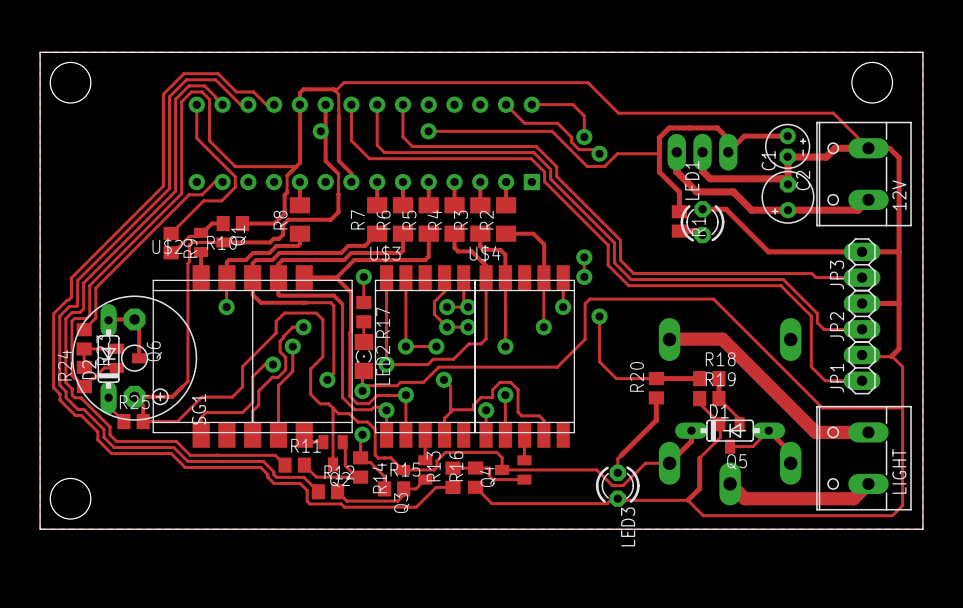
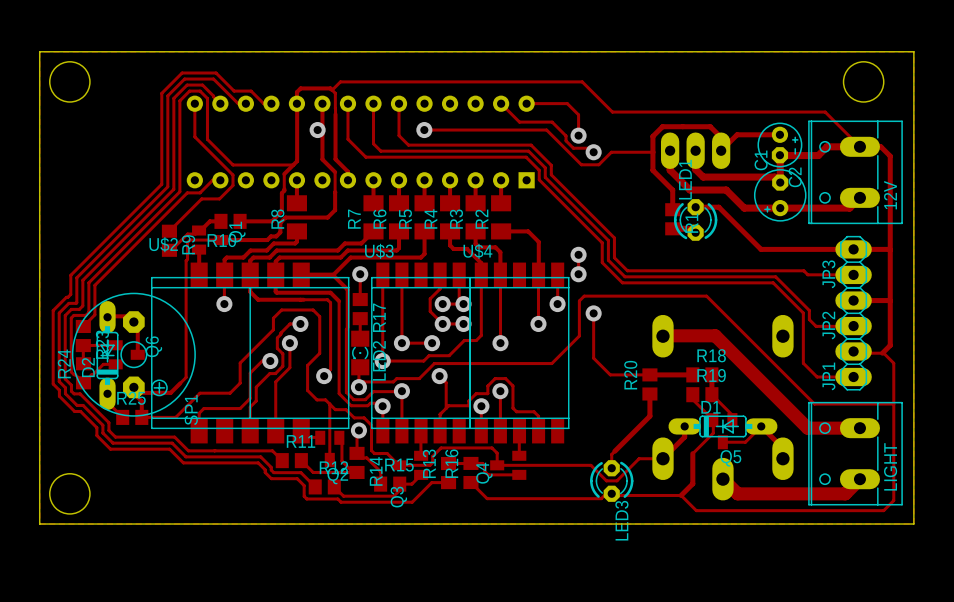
SG1: (134, 358) -> none
SP1: none -> (133, 354)

